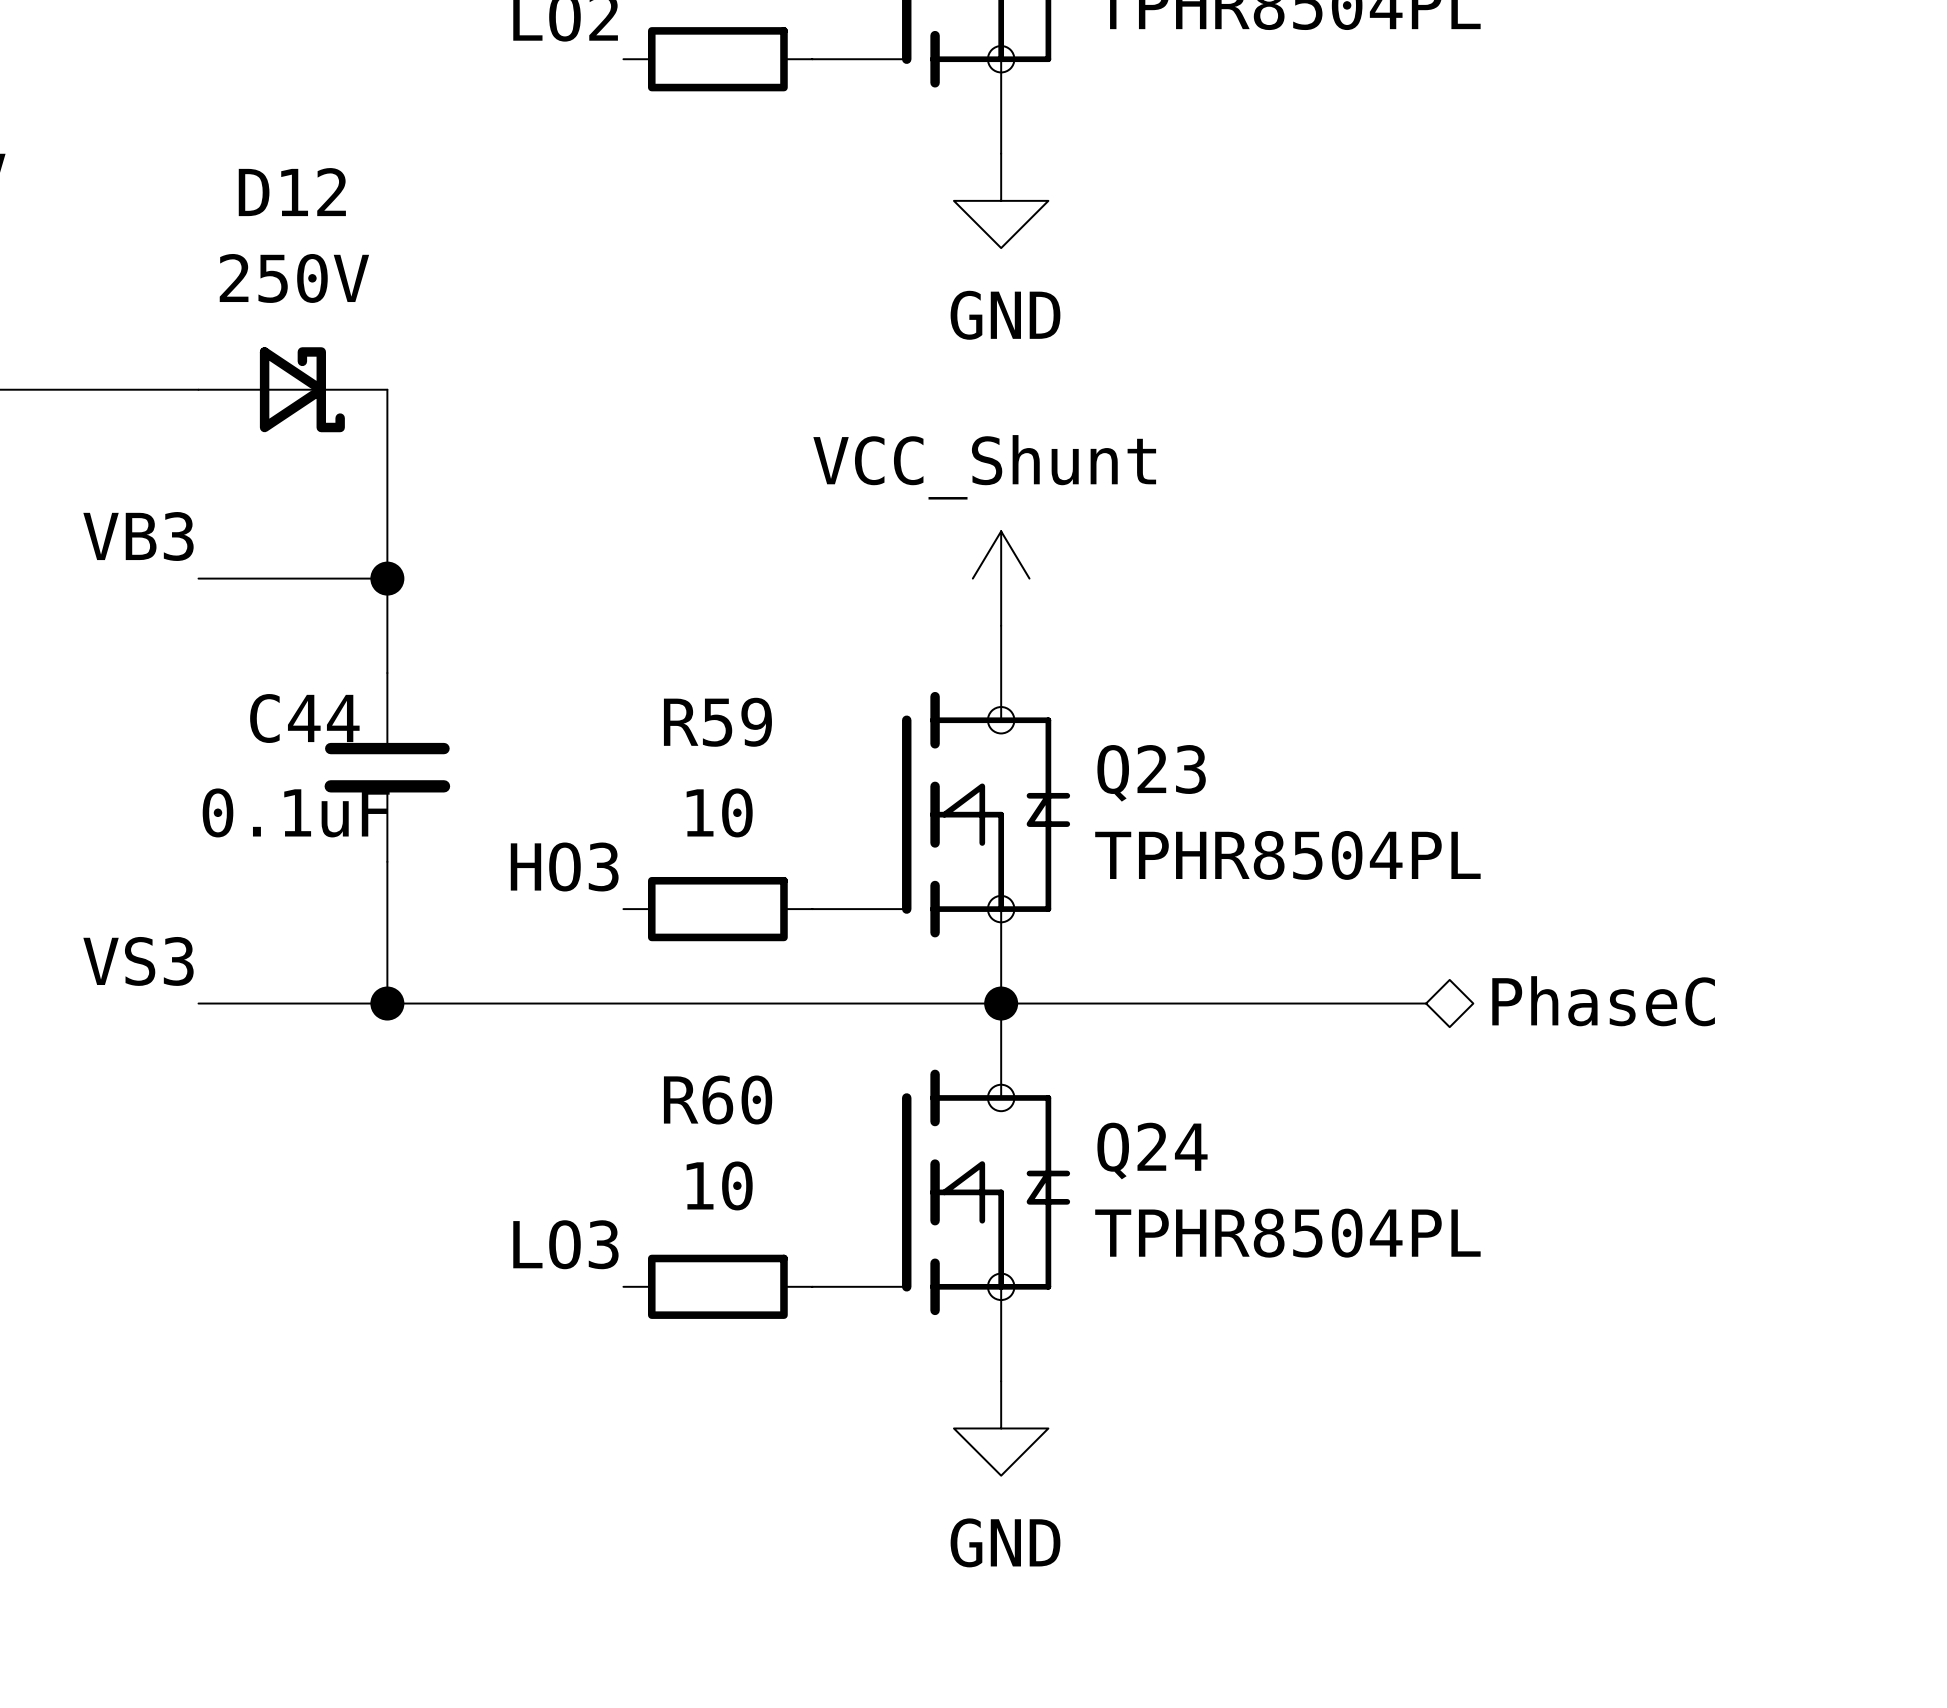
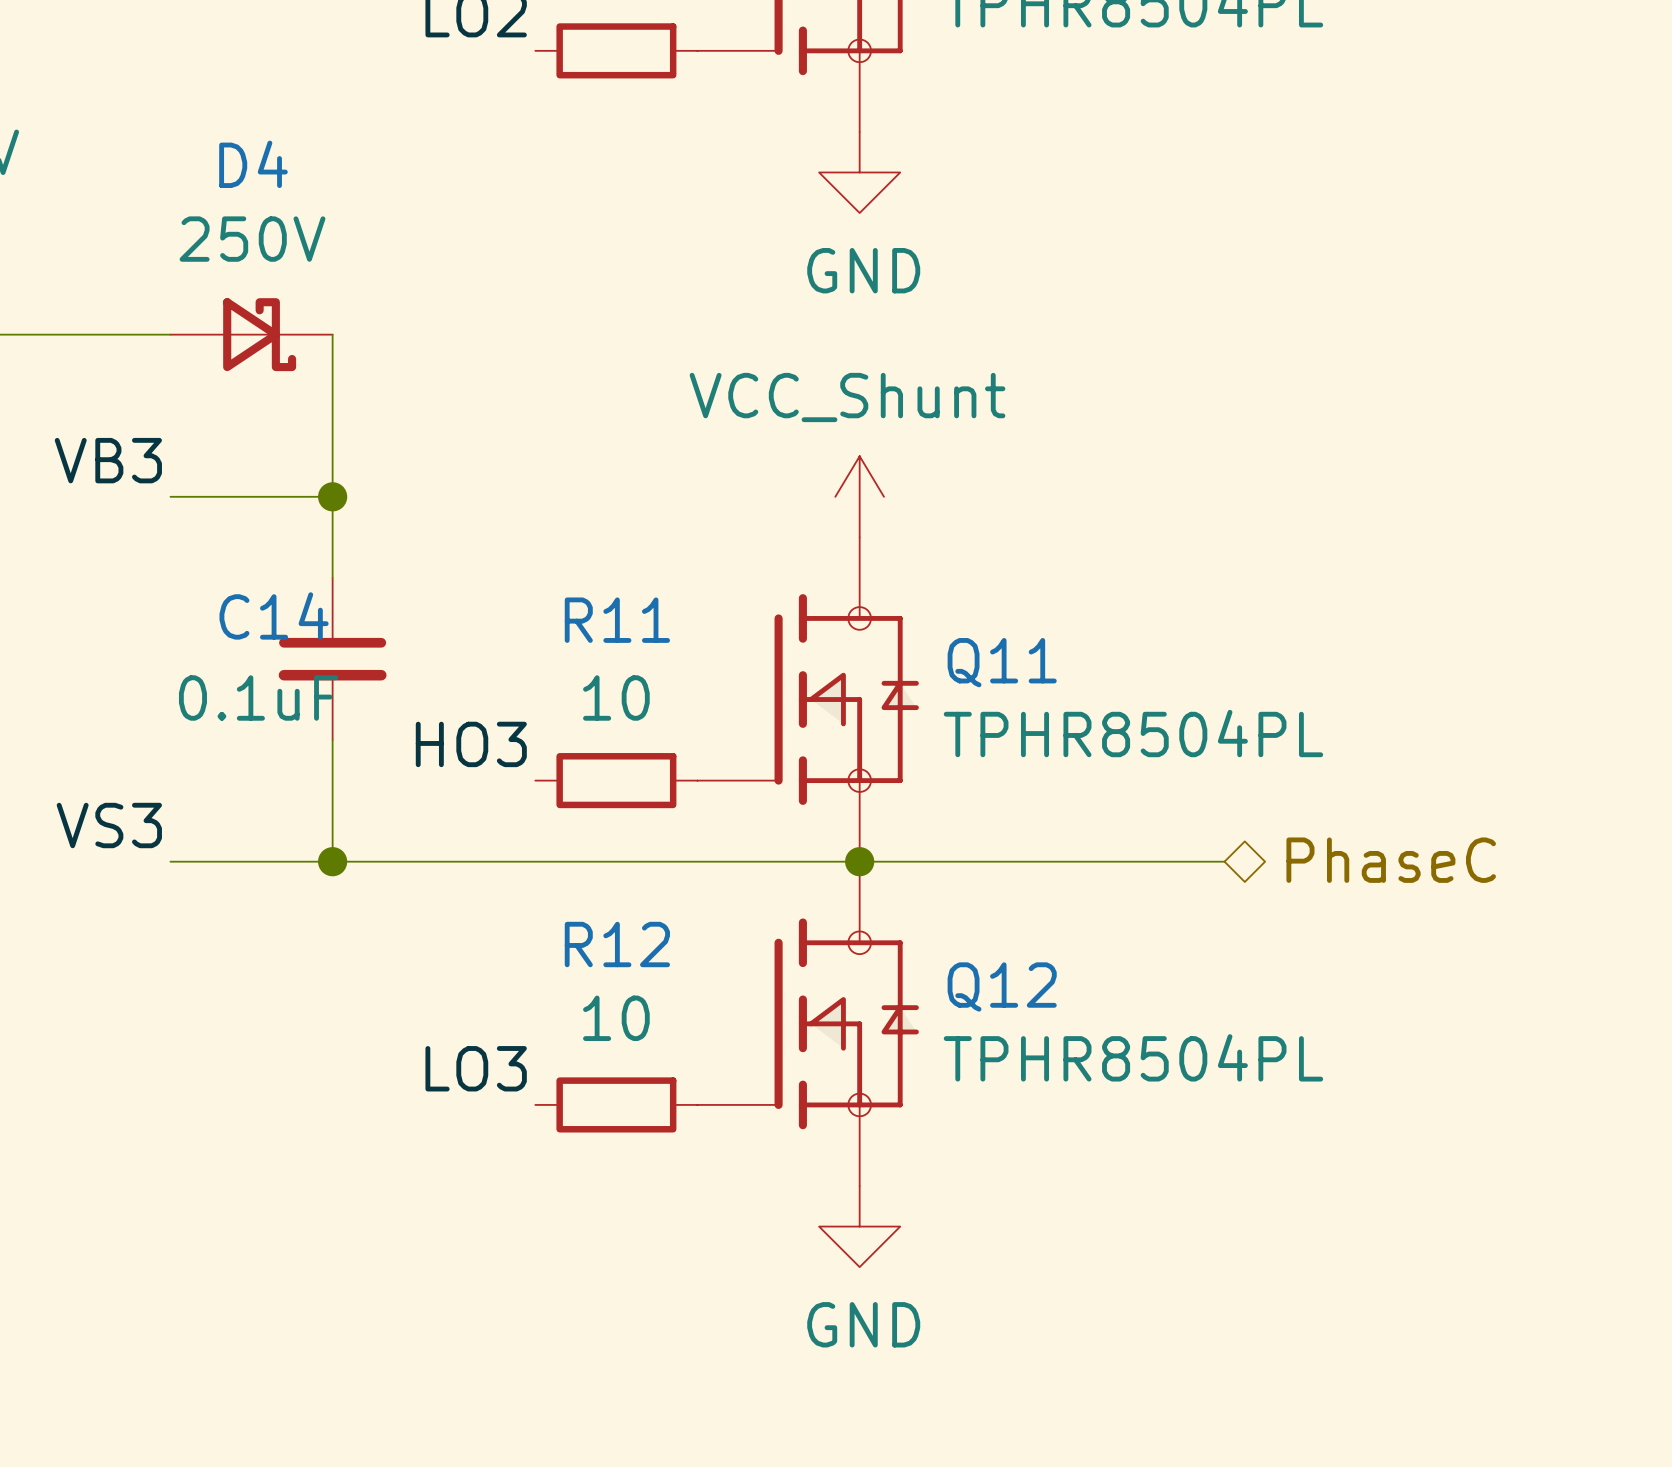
D12 name: D12 (292, 192) -> D4 (253, 164)
C44 name: C44 (304, 718) -> C14 (274, 615)
R59 name: R59 (717, 722) -> R11 (617, 620)
Q23 name: Q23 (1151, 773) -> Q11 (1002, 662)
R60 name: R60 (718, 1100) -> R12 (617, 944)
Q24 name: Q24 (1152, 1151) -> Q12 (1002, 986)

